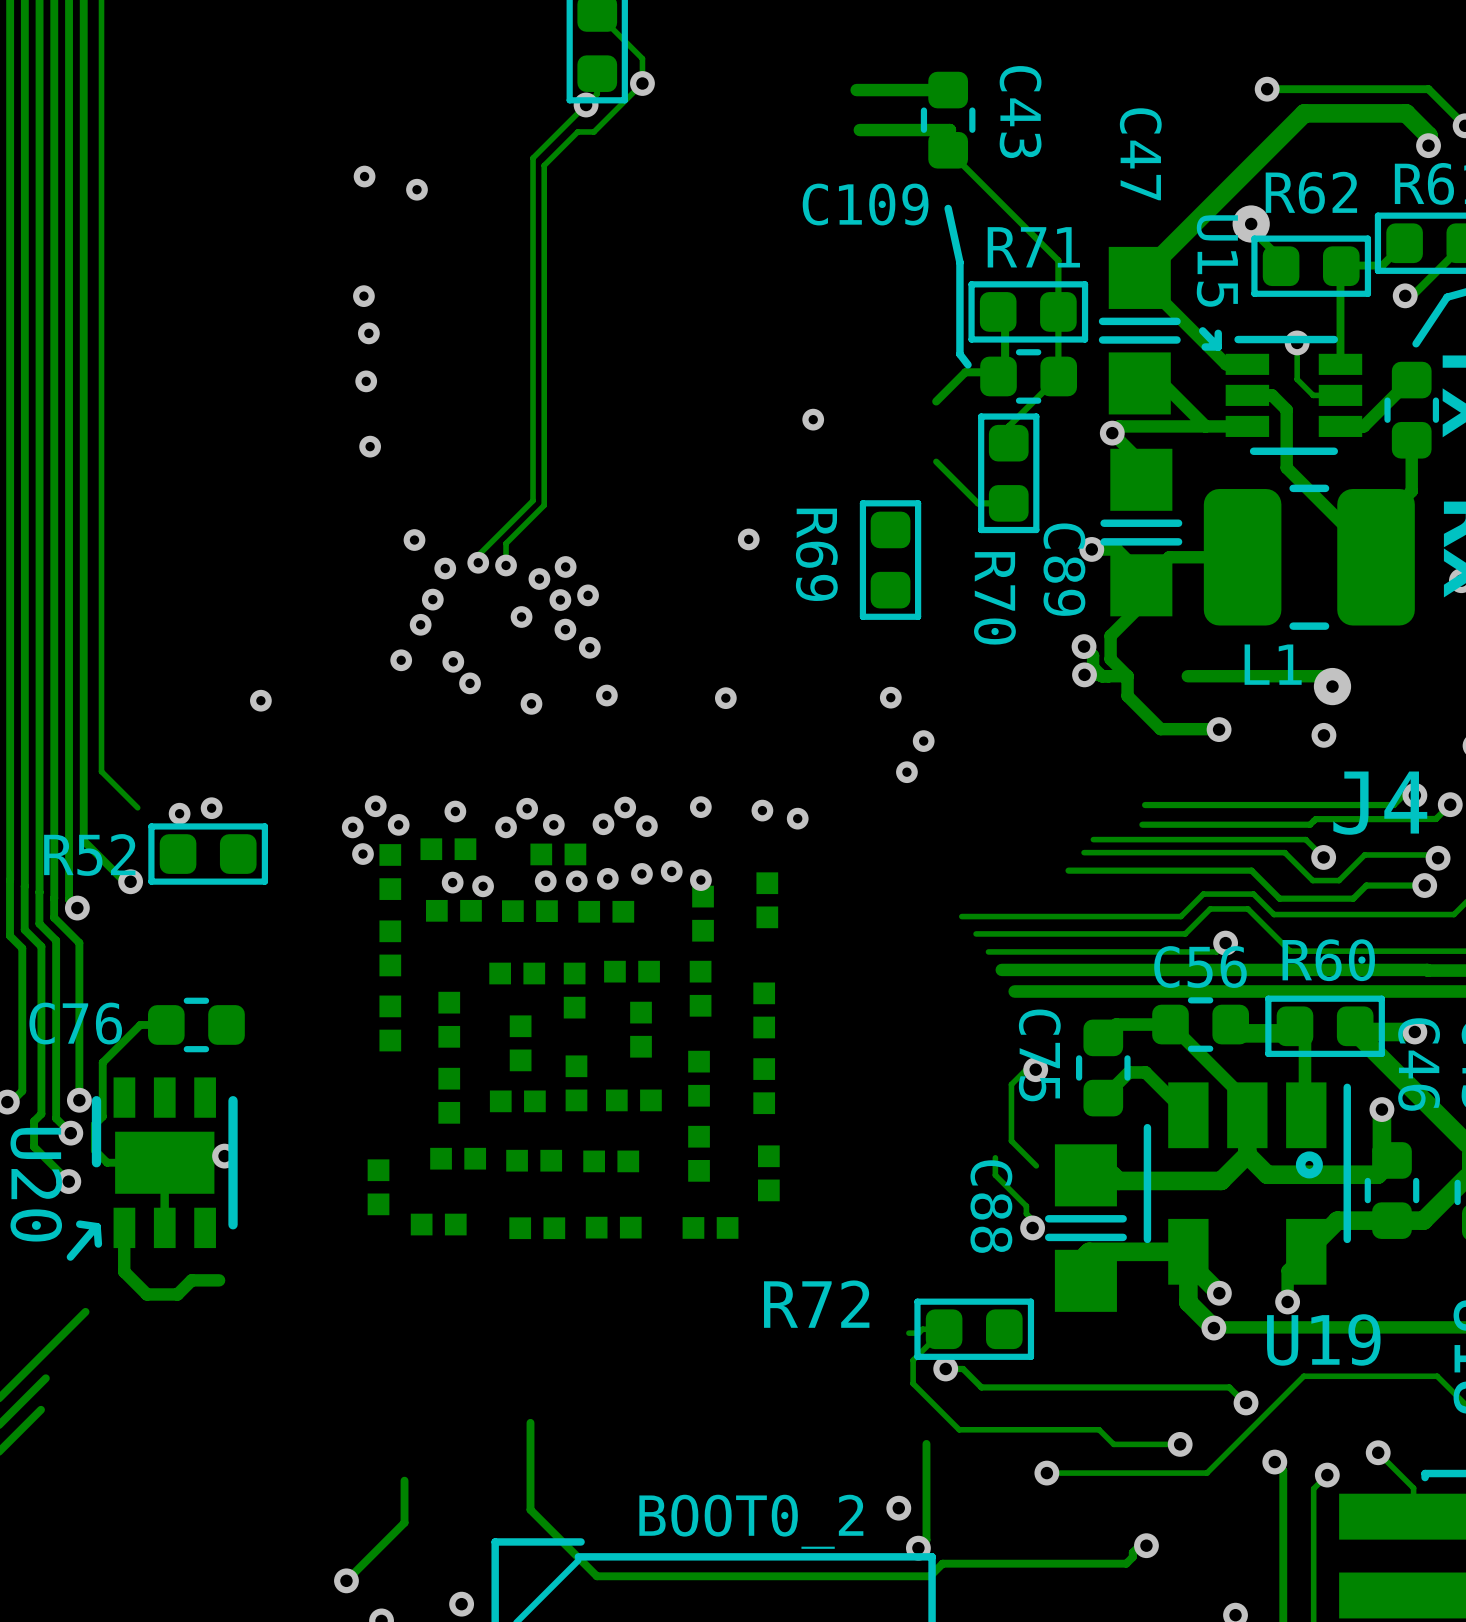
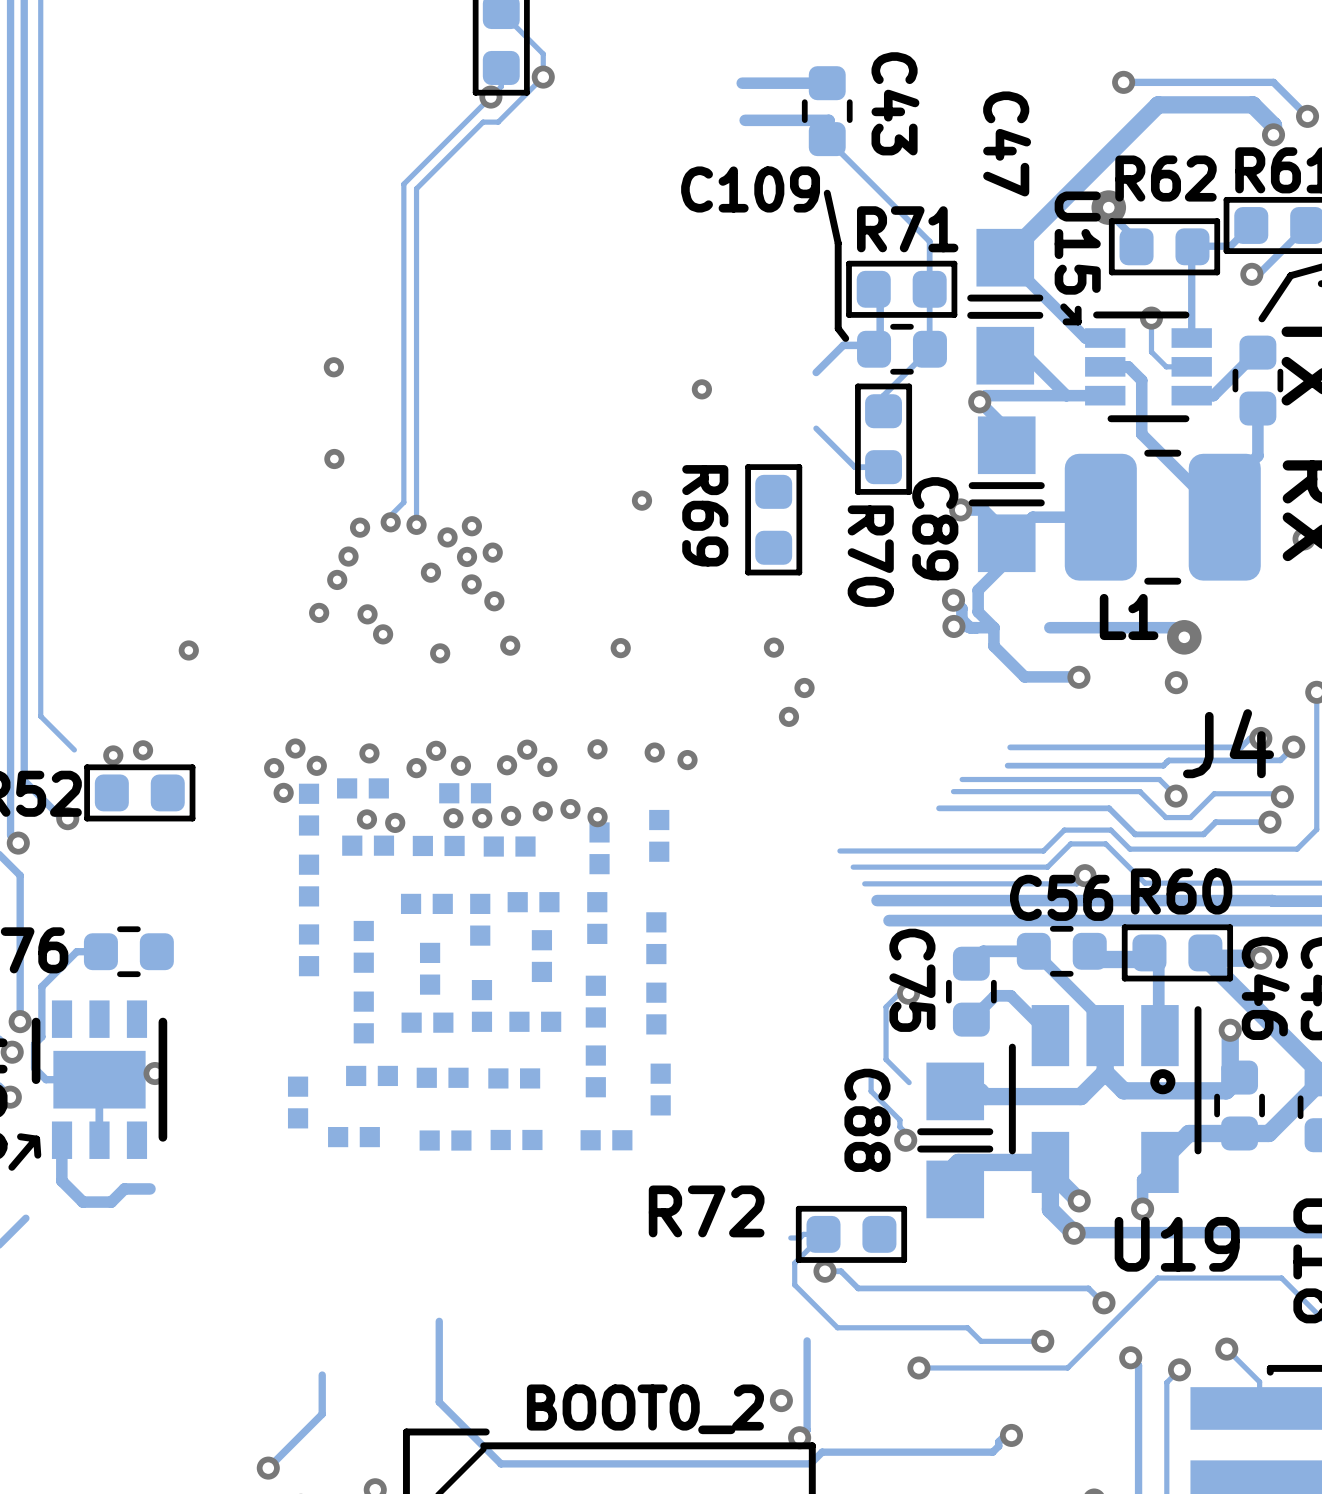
track: (533, 158) (533, 500) (492, 541) -> (441, 146) (403, 184) (403, 502)
track: (544, 165) (544, 505) (506, 543) -> (451, 153) (416, 188) (416, 504)
via: (364, 176) -> none
via: (416, 189) -> none
via: (363, 296) -> none
via: (368, 333) -> none
via: (366, 381) -> none
via: none -> (333, 367)
via: (370, 446) -> none
via: none -> (334, 459)
via: (414, 540) -> none

